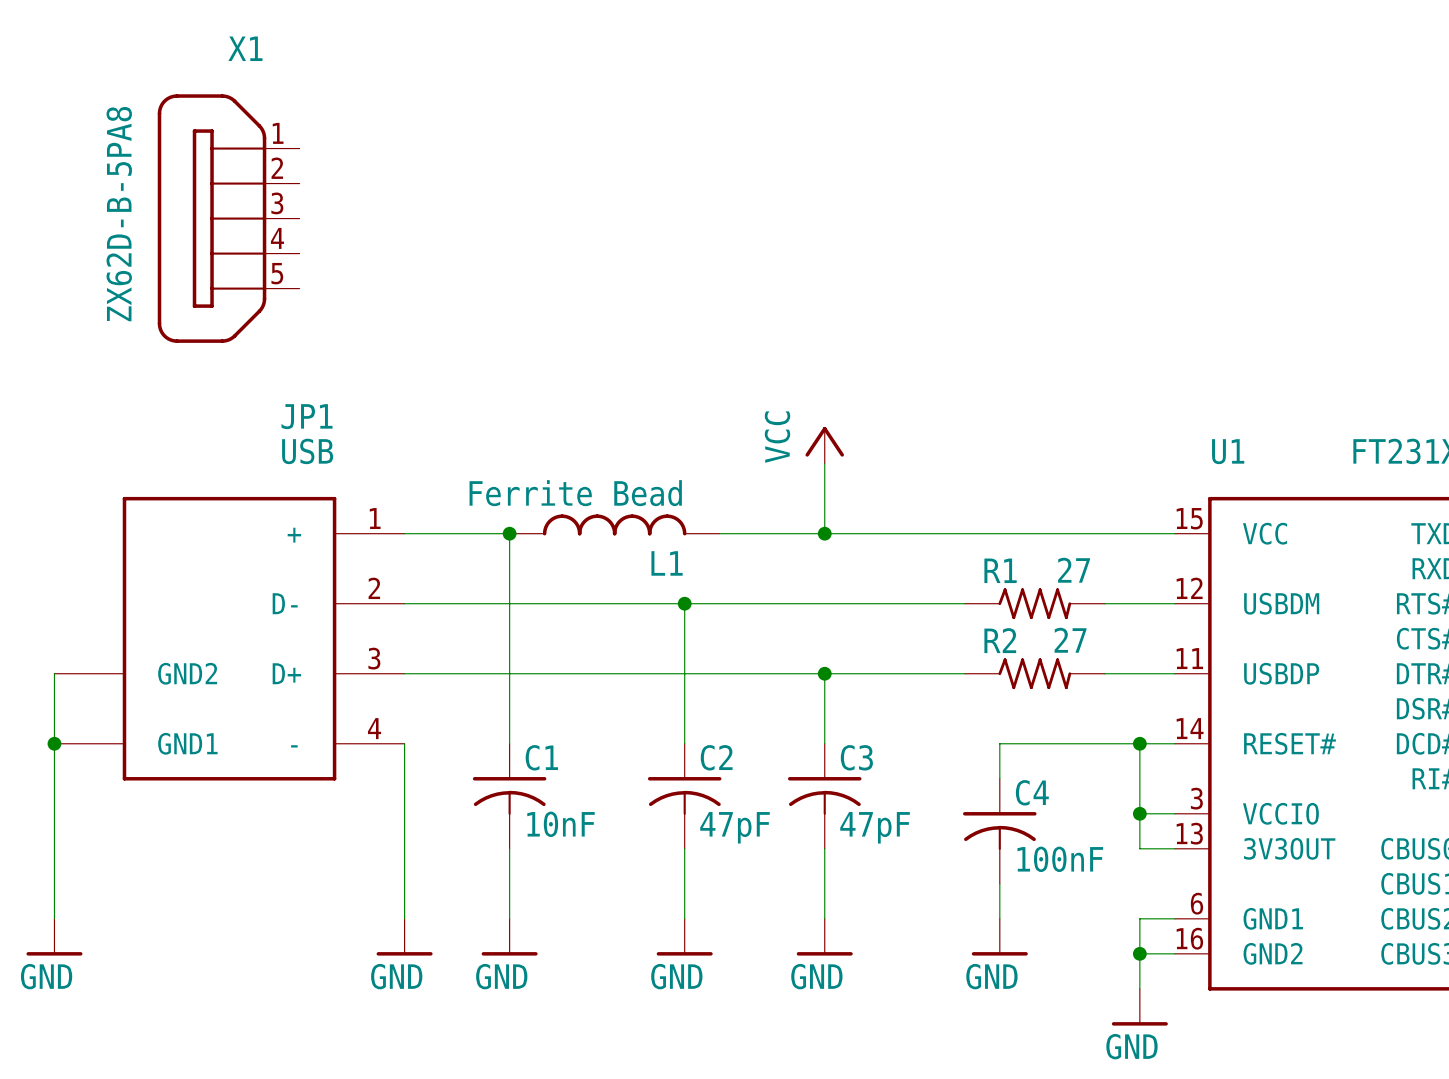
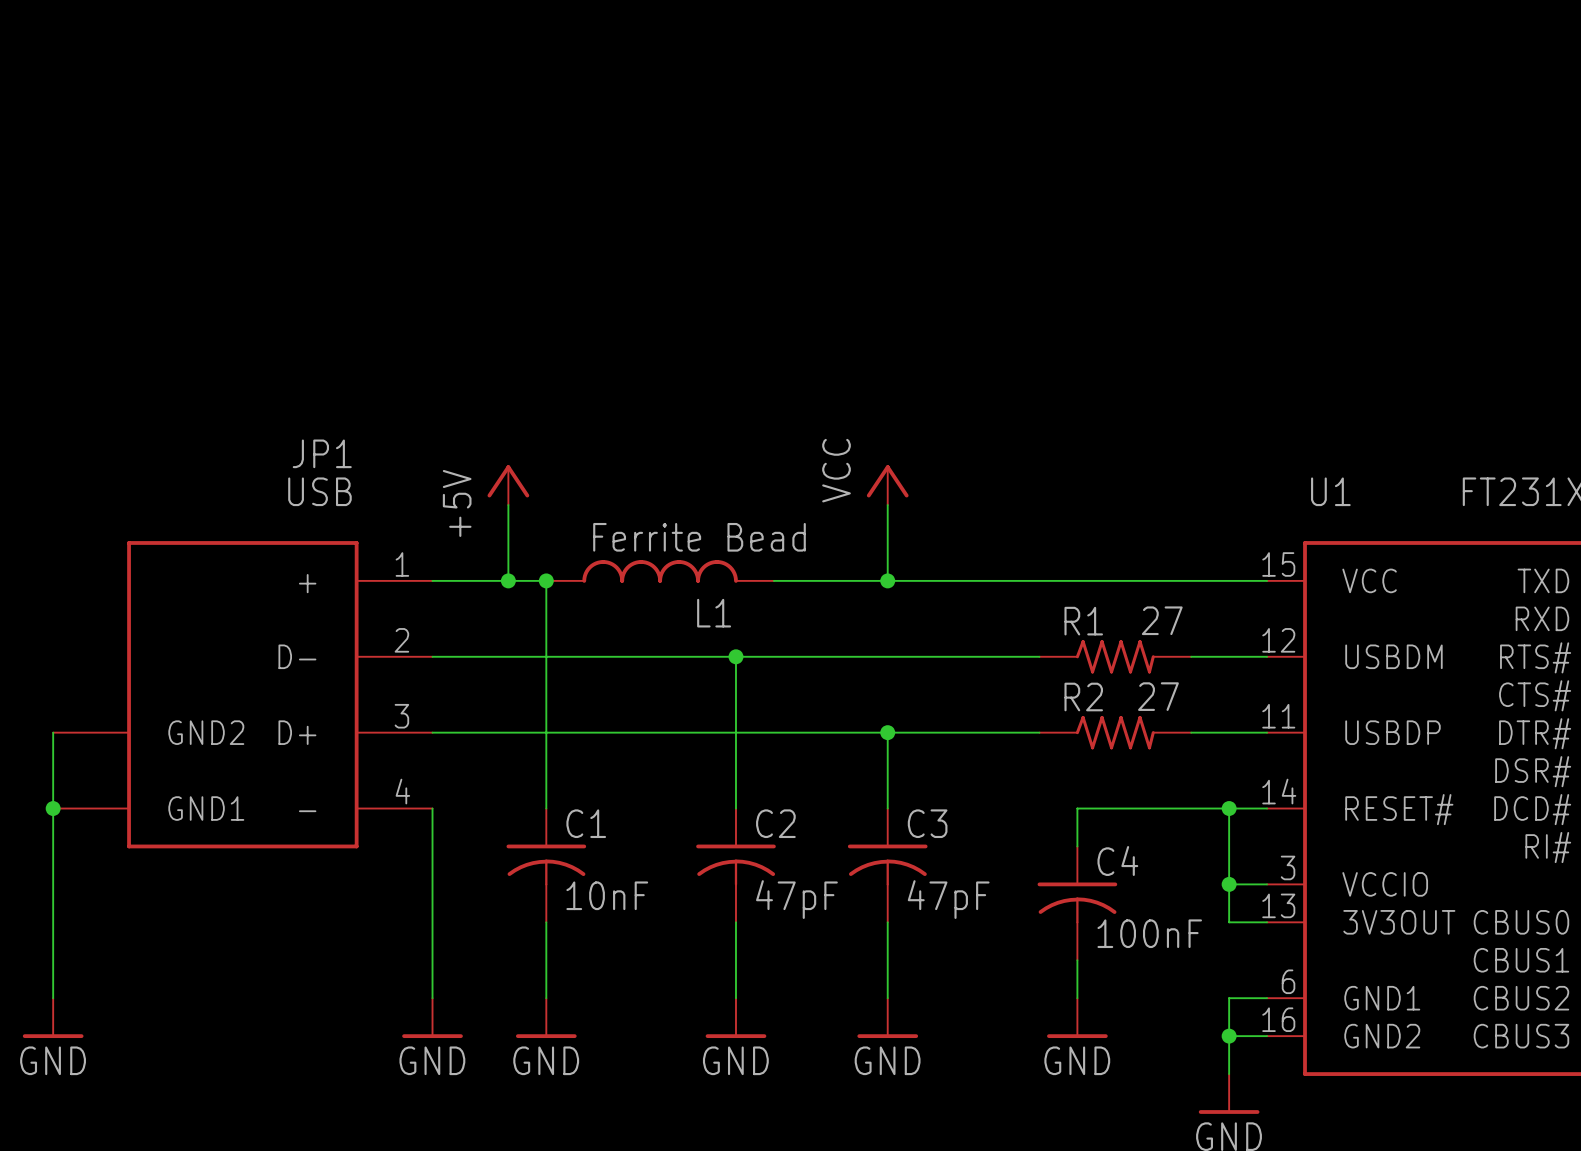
X1: ZX62D-B-5PA8 (228, 218) -> none
power symbol: none -> +5V (508, 485)
wire: none -> (508, 505) (508, 580)
L1 value position: Ferrite Bead (575, 493) -> Ferrite Bead (699, 537)
junction: none -> (508, 580)

